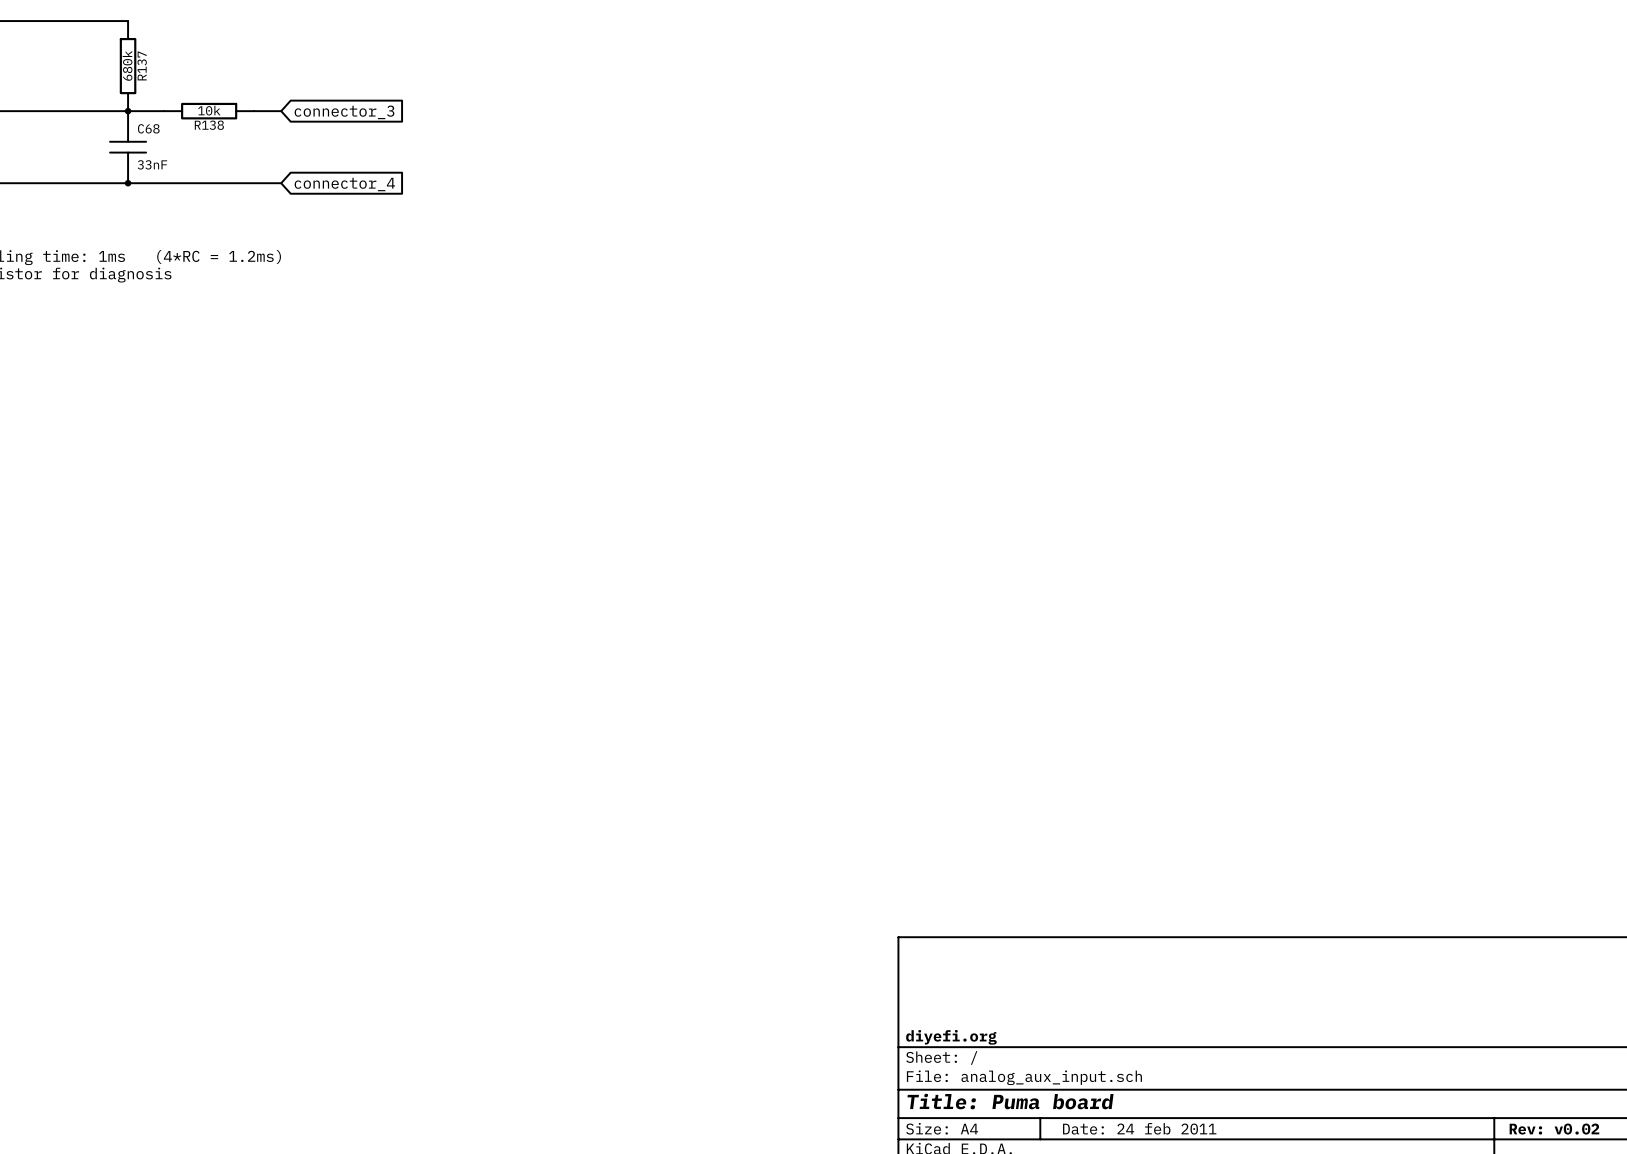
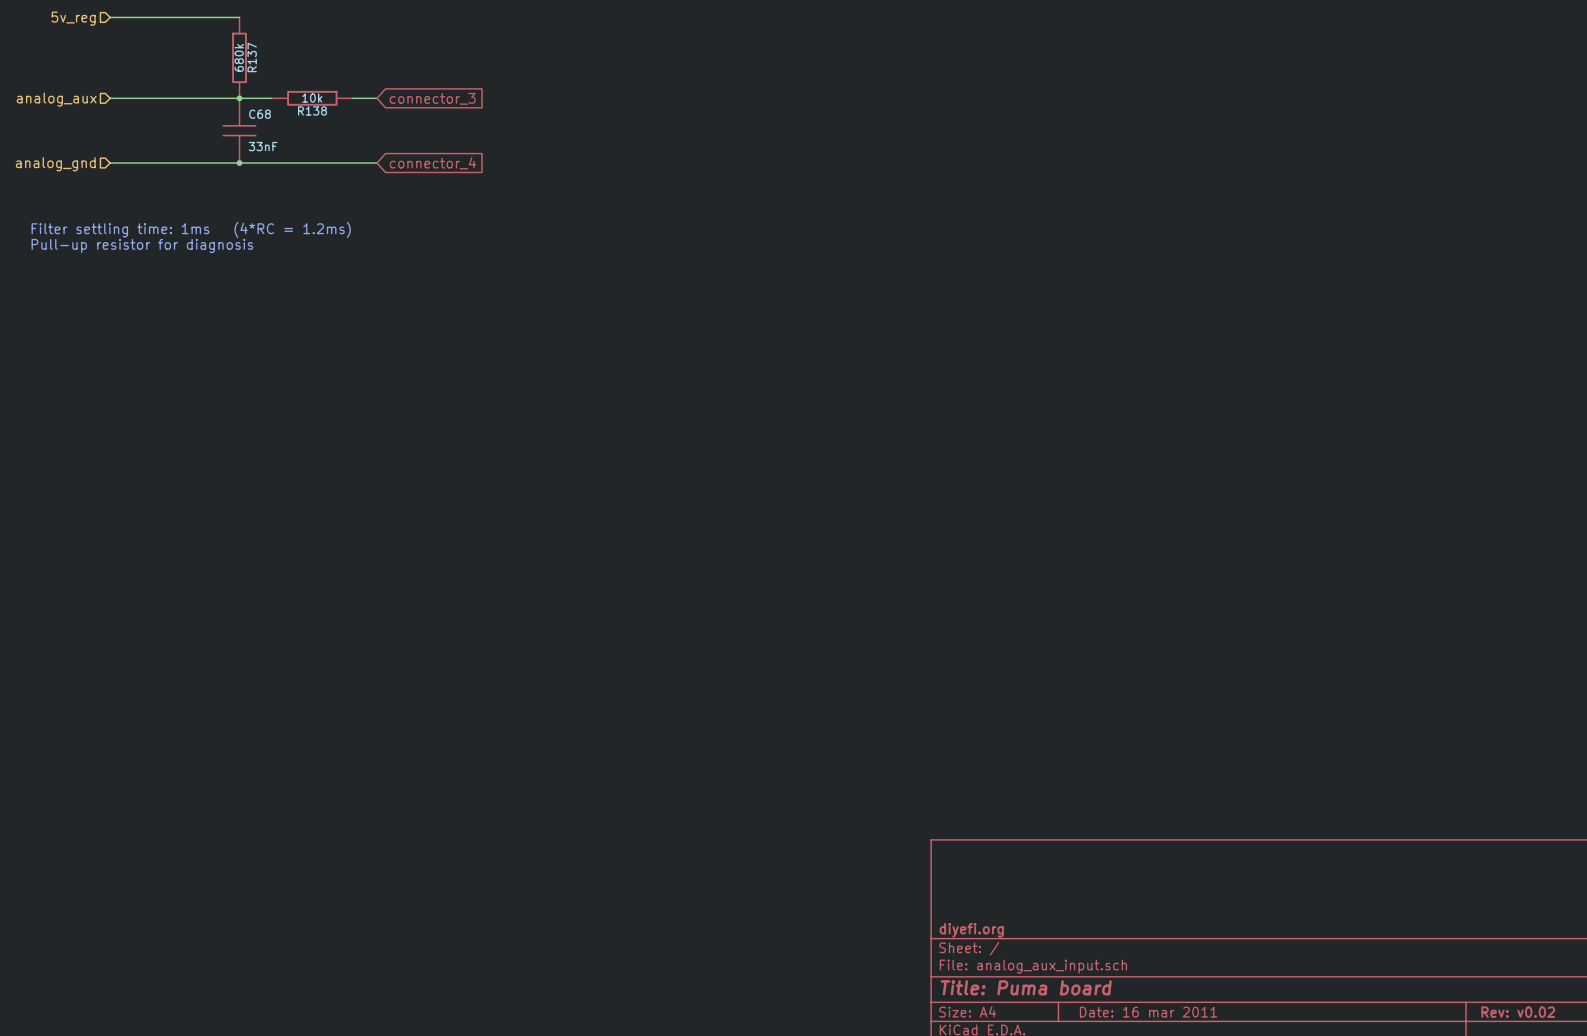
title block: Date: 24 feb 2011 (1139, 1128) -> Date: 16 mar 2011 (1148, 1012)

